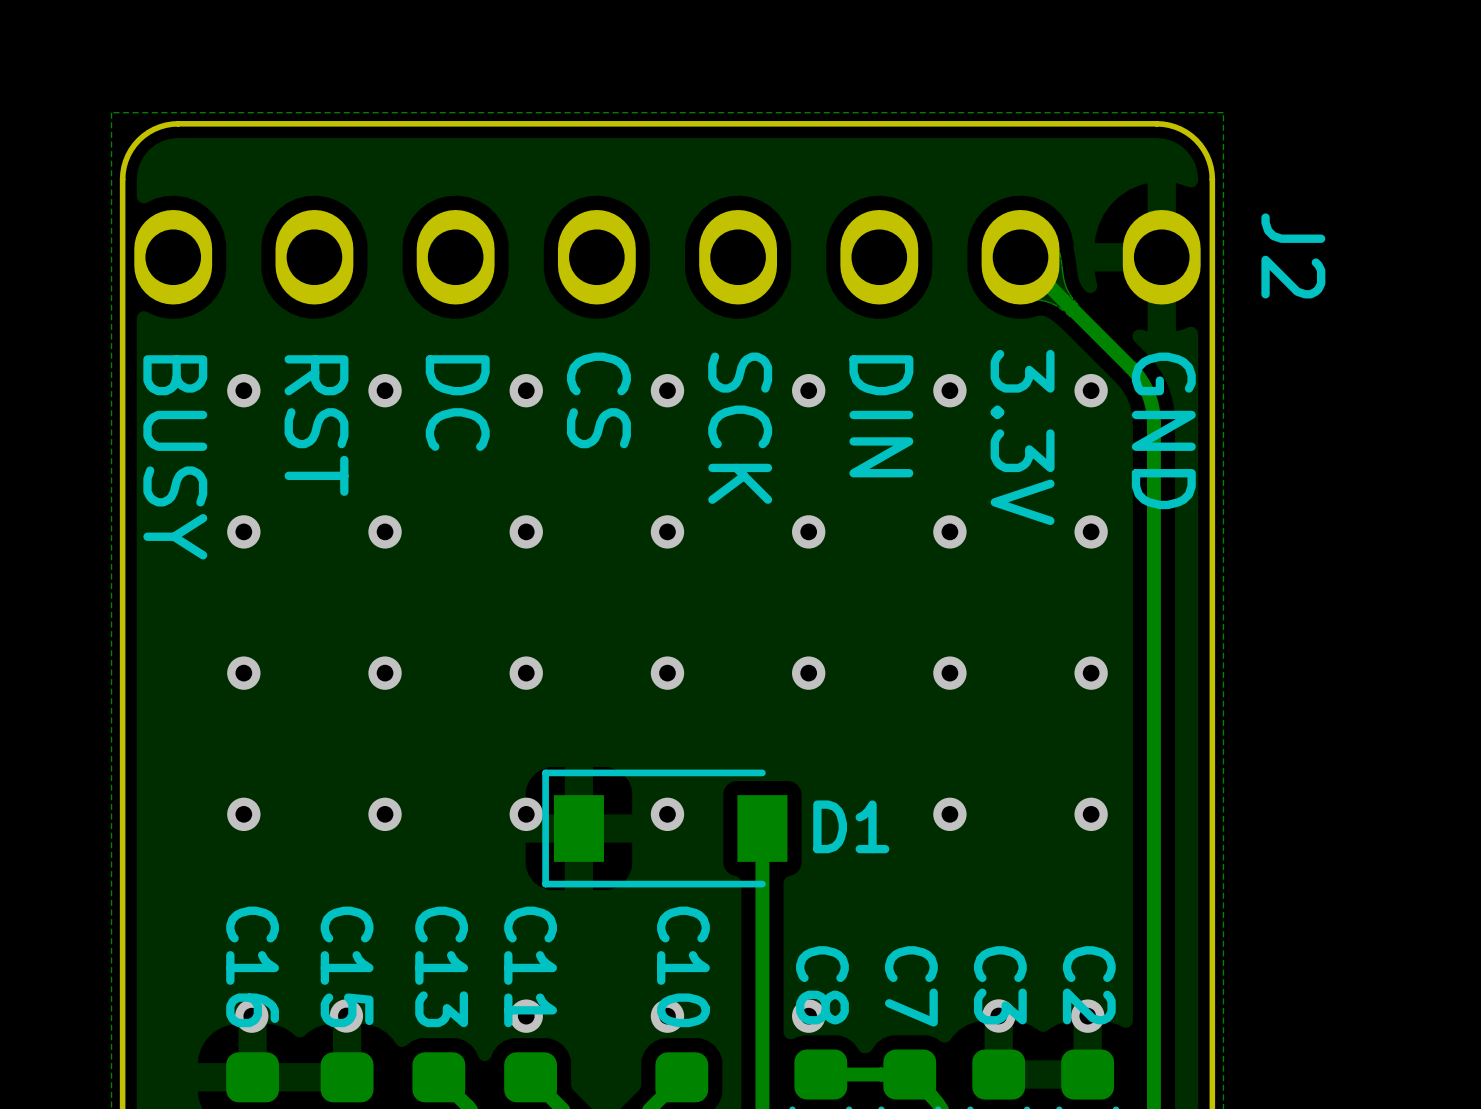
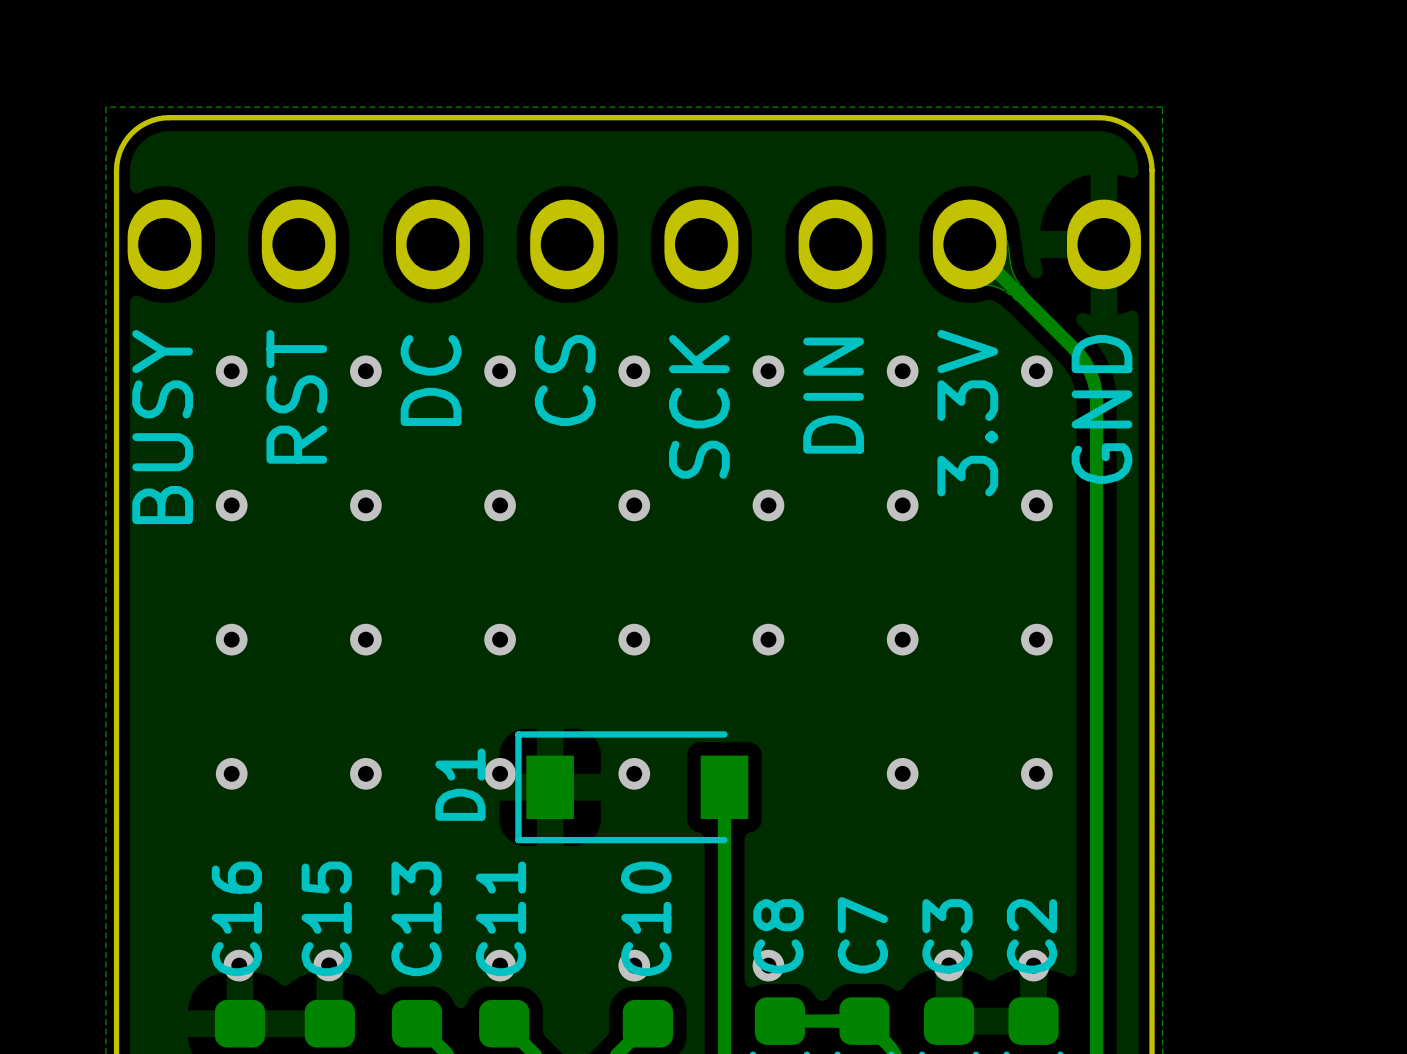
J2 name: J2 (1293, 255) -> none
text rotation: 0° (598, 400) -> 180° (565, 380)
text rotation: 0° (457, 403) -> 180° (431, 380)
text rotation: 0° (881, 416) -> 180° (833, 395)
text rotation: 0° (316, 425) -> 180° (296, 396)
text rotation: 0° (740, 428) -> 180° (699, 406)
text rotation: 0° (1163, 430) -> 180° (1101, 409)
text rotation: 0° (1022, 437) -> 180° (967, 413)
text rotation: 0° (175, 457) -> 180° (162, 427)
D1 name rotation: 0° (851, 826) -> 90° counterclockwise (460, 784)
D1 name position: D1 (851, 826) -> D1 (460, 784)
C16 name rotation: 0° (252, 966) -> 180° (236, 918)
C15 name rotation: 0° (347, 966) -> 180° (326, 918)
C13 name rotation: 0° (441, 966) -> 180° (416, 918)
C11 name rotation: 0° (530, 966) -> 180° (501, 918)
C10 name rotation: 0° (683, 966) -> 180° (646, 918)
C8 name rotation: 0° (822, 985) -> 180° (778, 936)
C3 name rotation: 0° (1000, 985) -> 180° (947, 936)
C2 name rotation: 0° (1089, 985) -> 180° (1031, 936)
C7 name rotation: 0° (911, 986) -> 180° (862, 935)

